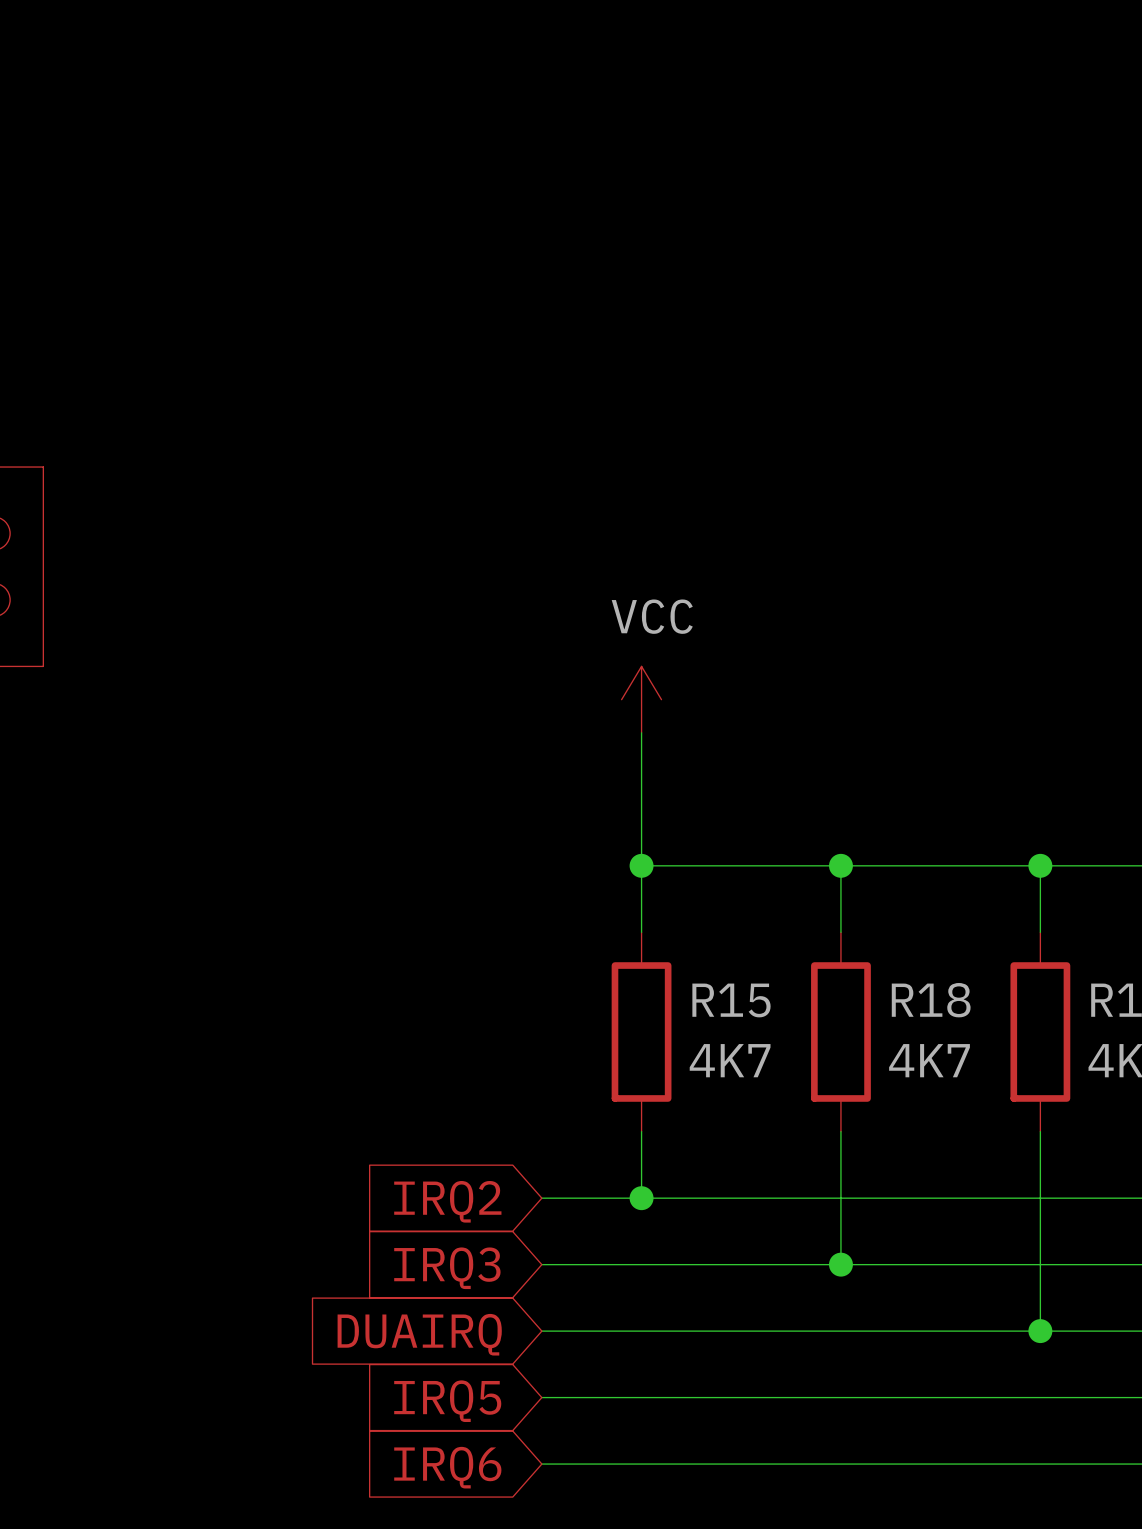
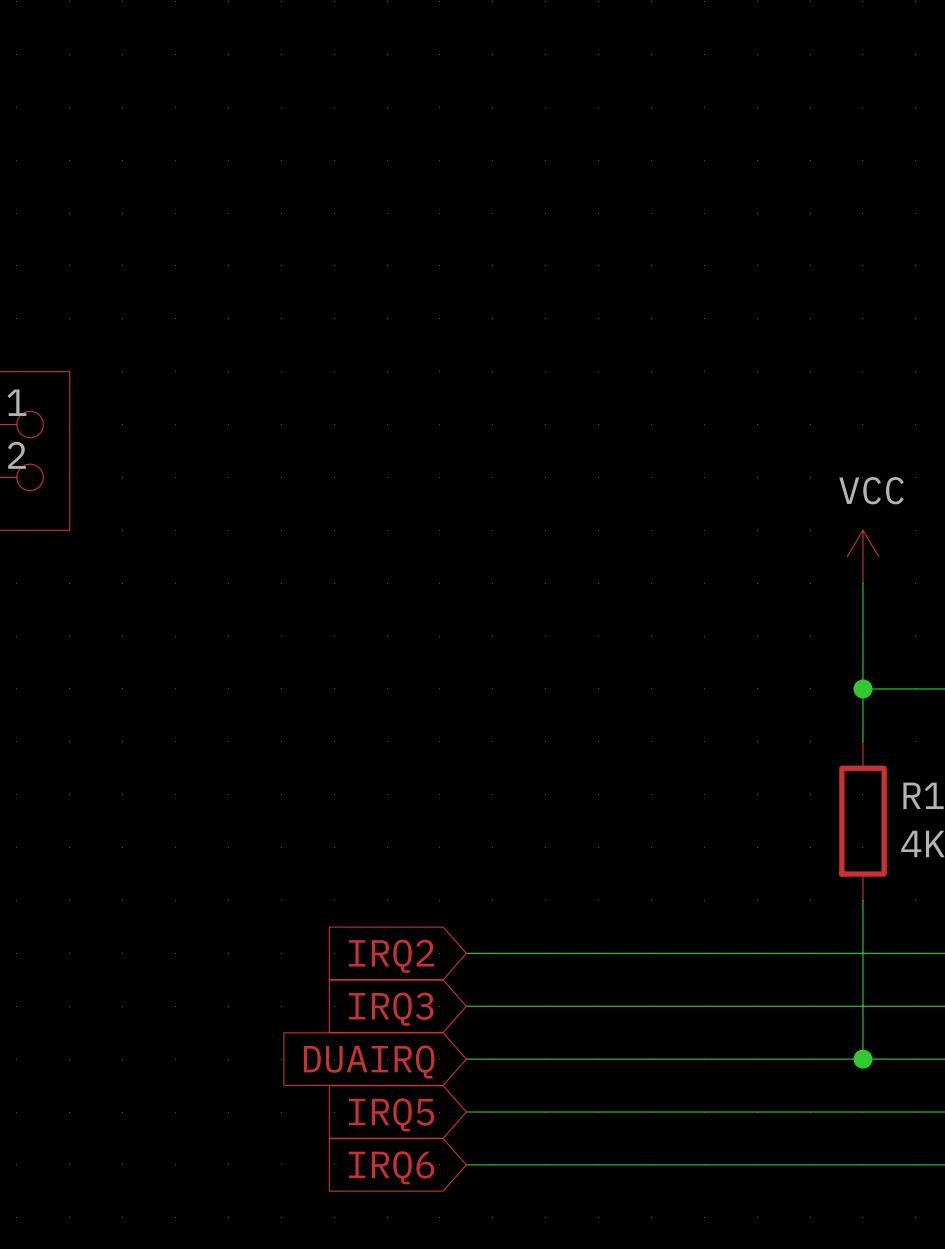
power symbol position: VCC (641, 699) -> VCC (862, 556)
wire: (641, 732) (641, 932) -> none
wire: (641, 865) (1040, 865) -> (862, 583) (862, 688)
junction: (641, 865) -> none
wire: (840, 865) (840, 932) -> none
junction: (840, 865) -> none
R15: 4K7 (641, 1032) -> none
R18: 4K7 (840, 1032) -> none
wire: (641, 1131) (641, 1198) -> none
wire: (840, 1131) (840, 1264) -> none
junction: (641, 1198) -> none
junction: (840, 1264) -> none

